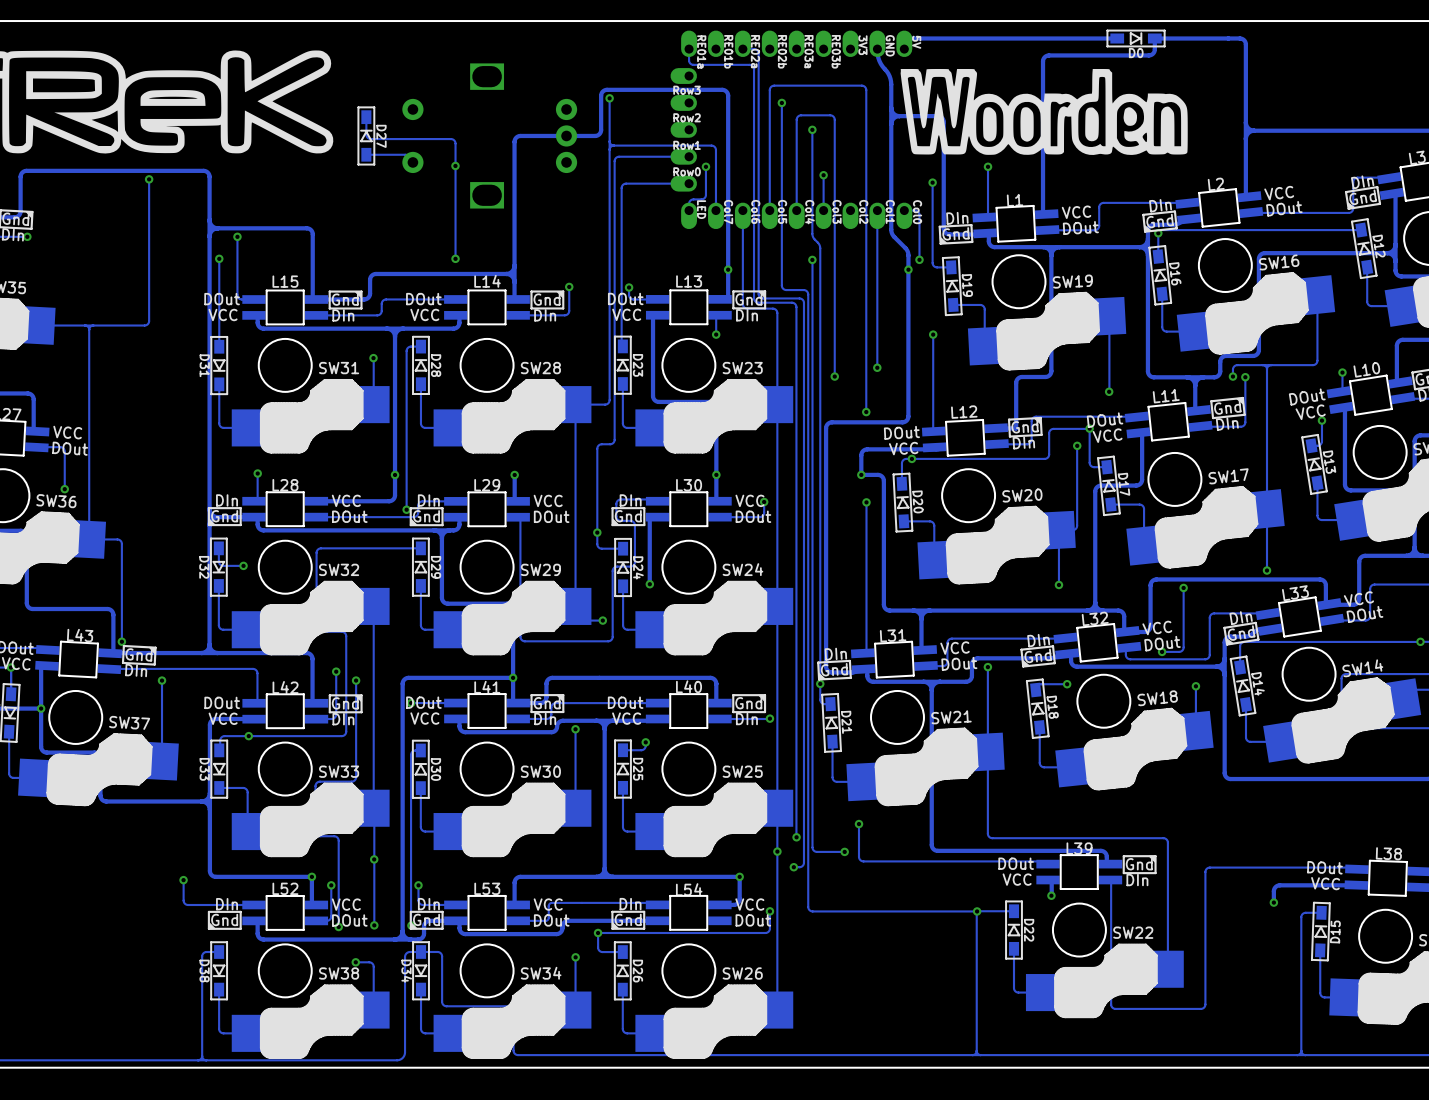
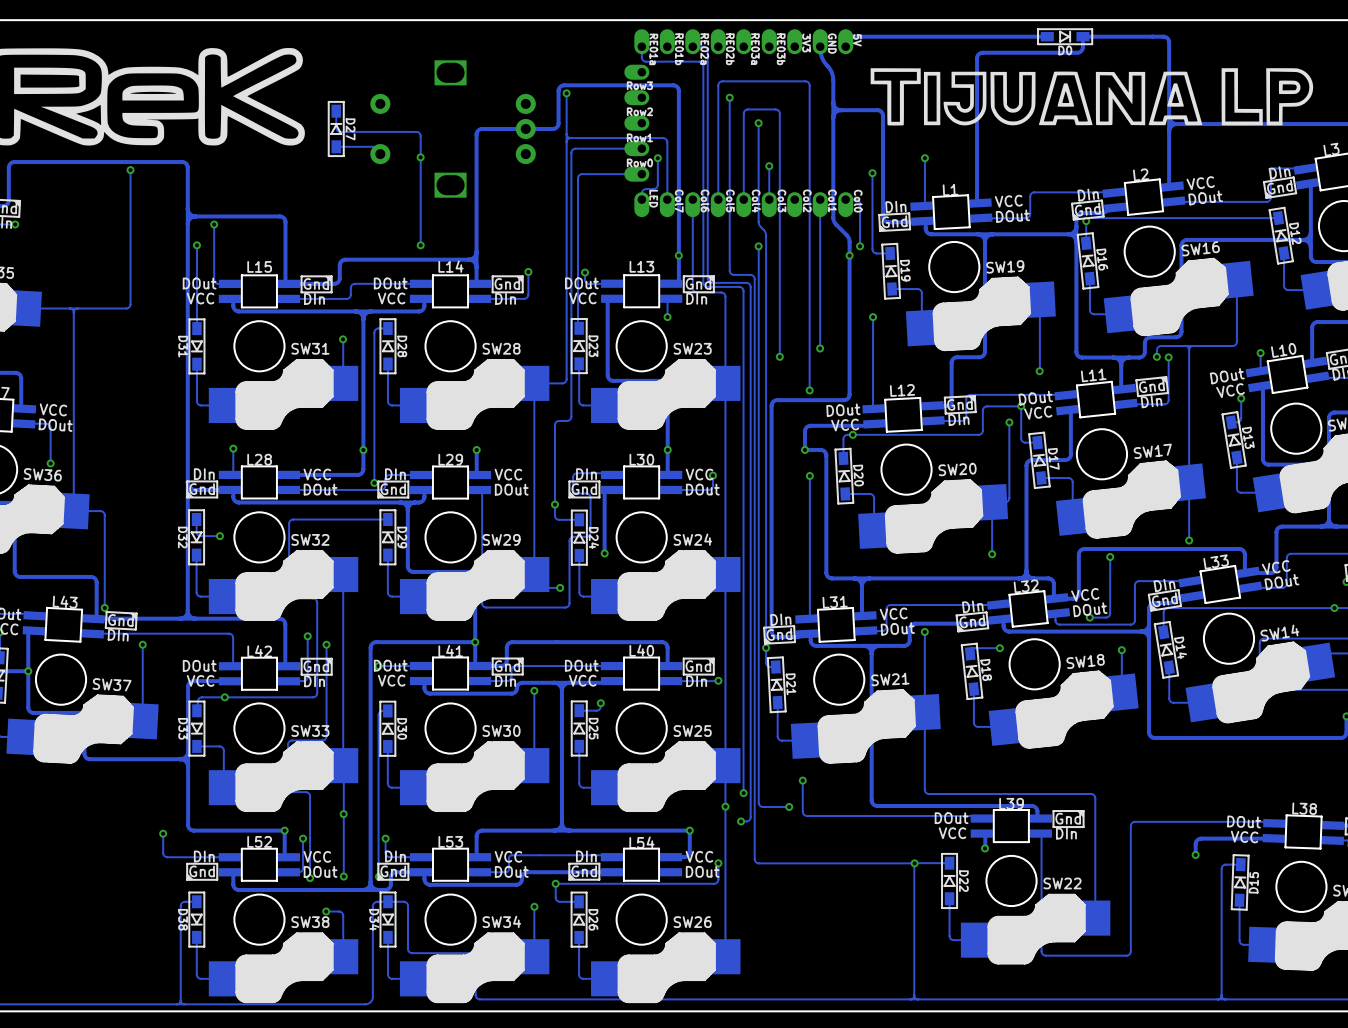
drawing: [900, 69, 1188, 155] -> none
drawing: none -> [870, 68, 1314, 126]

